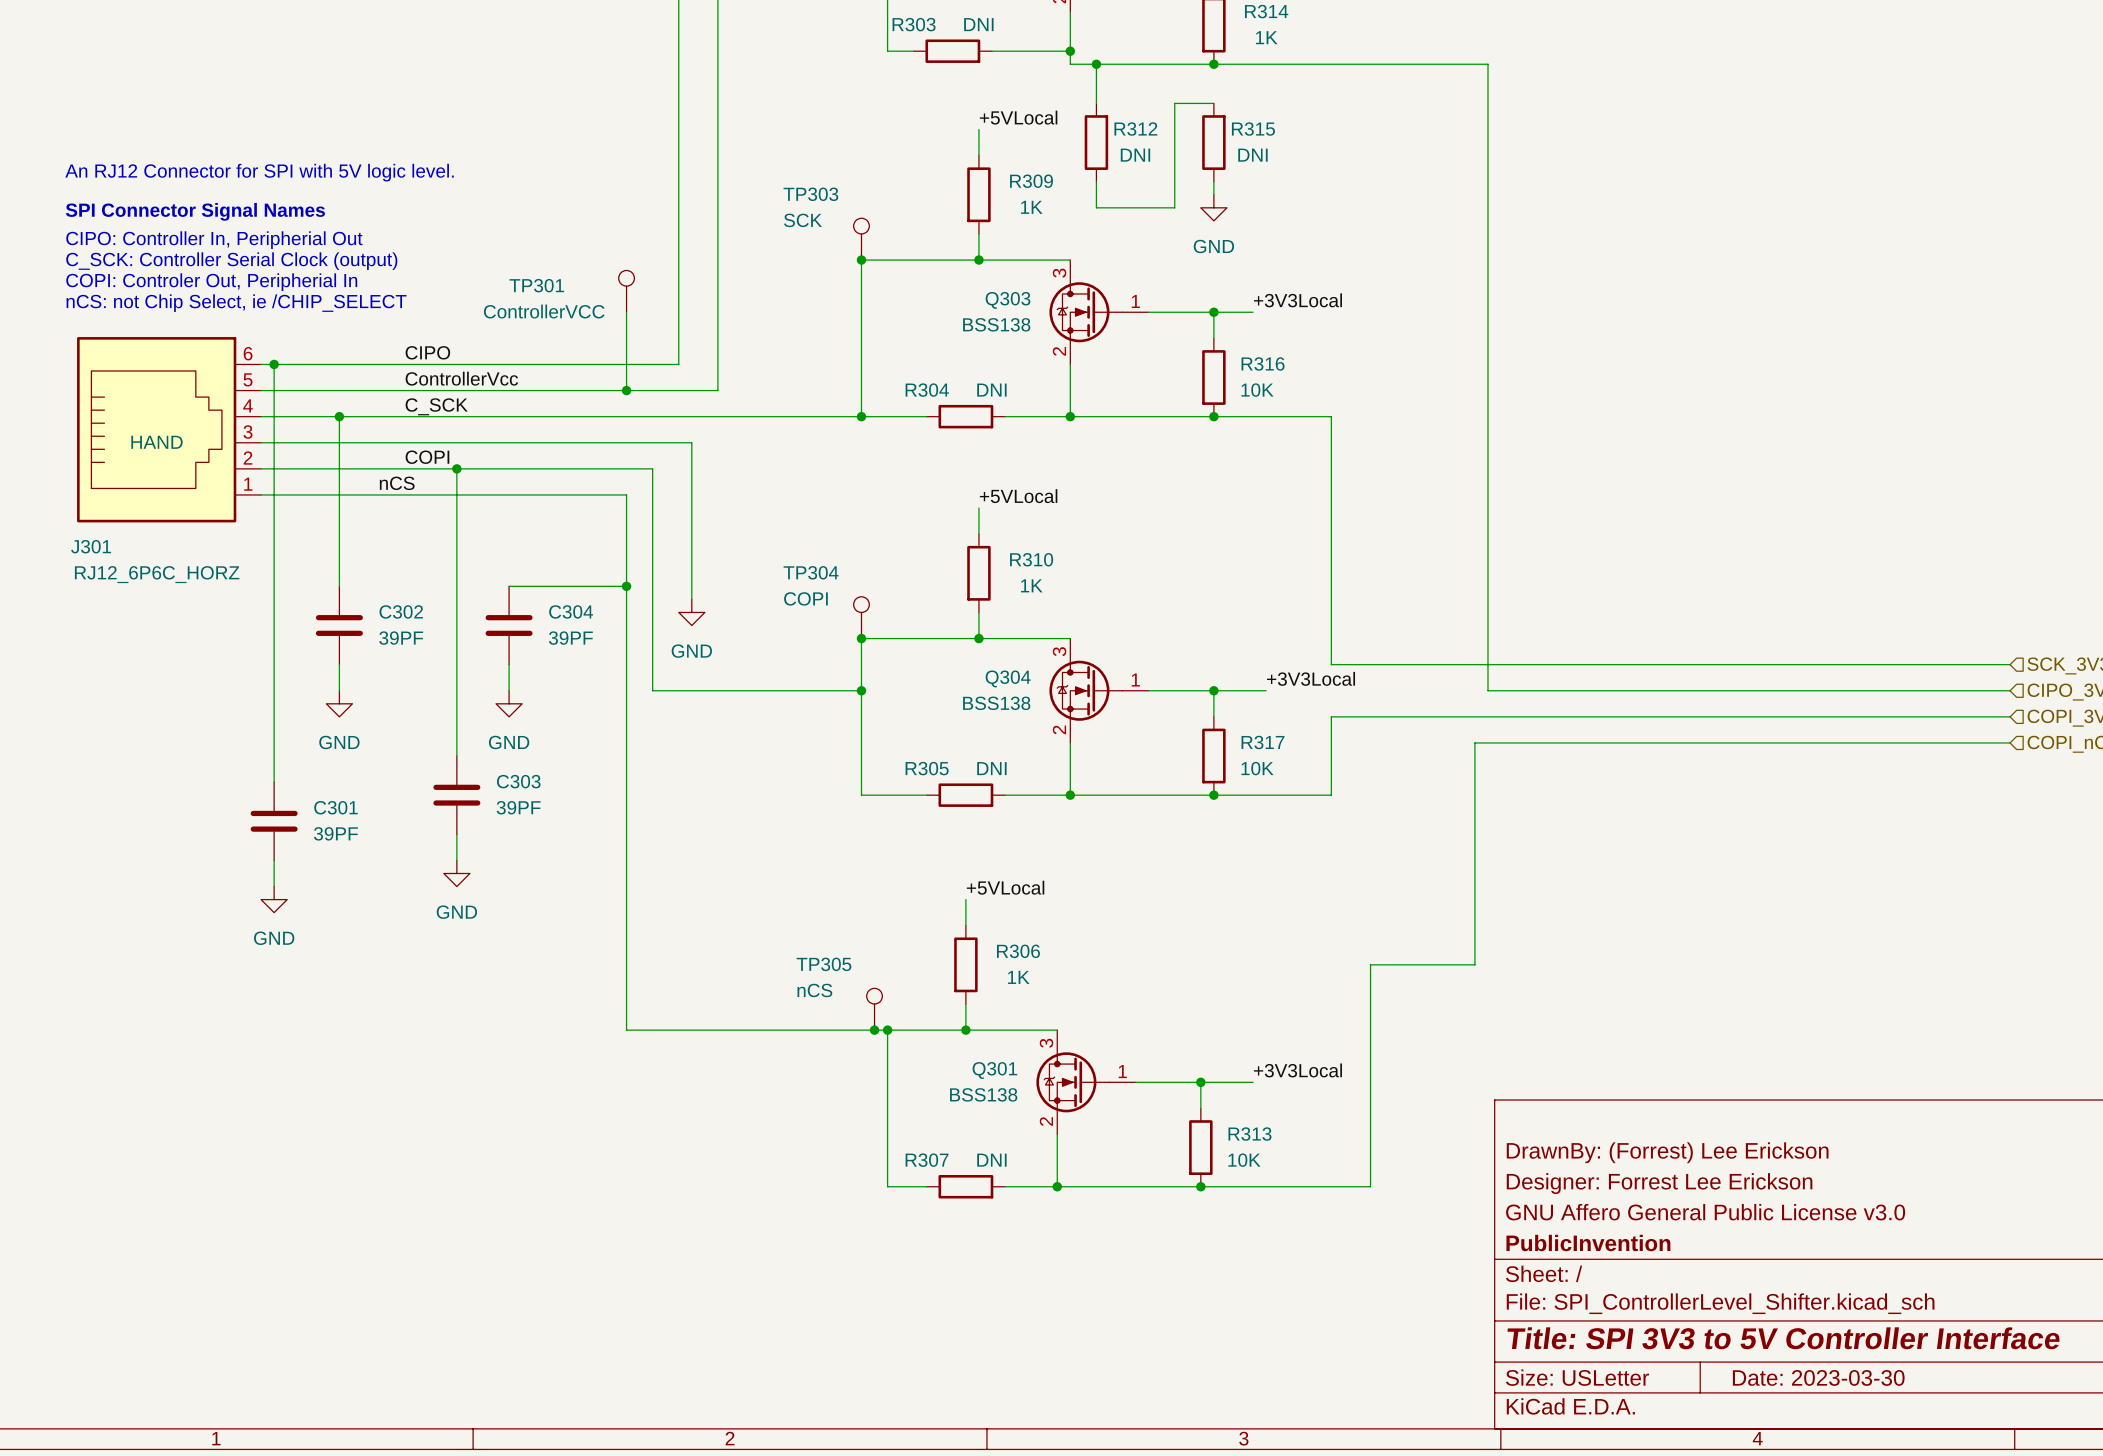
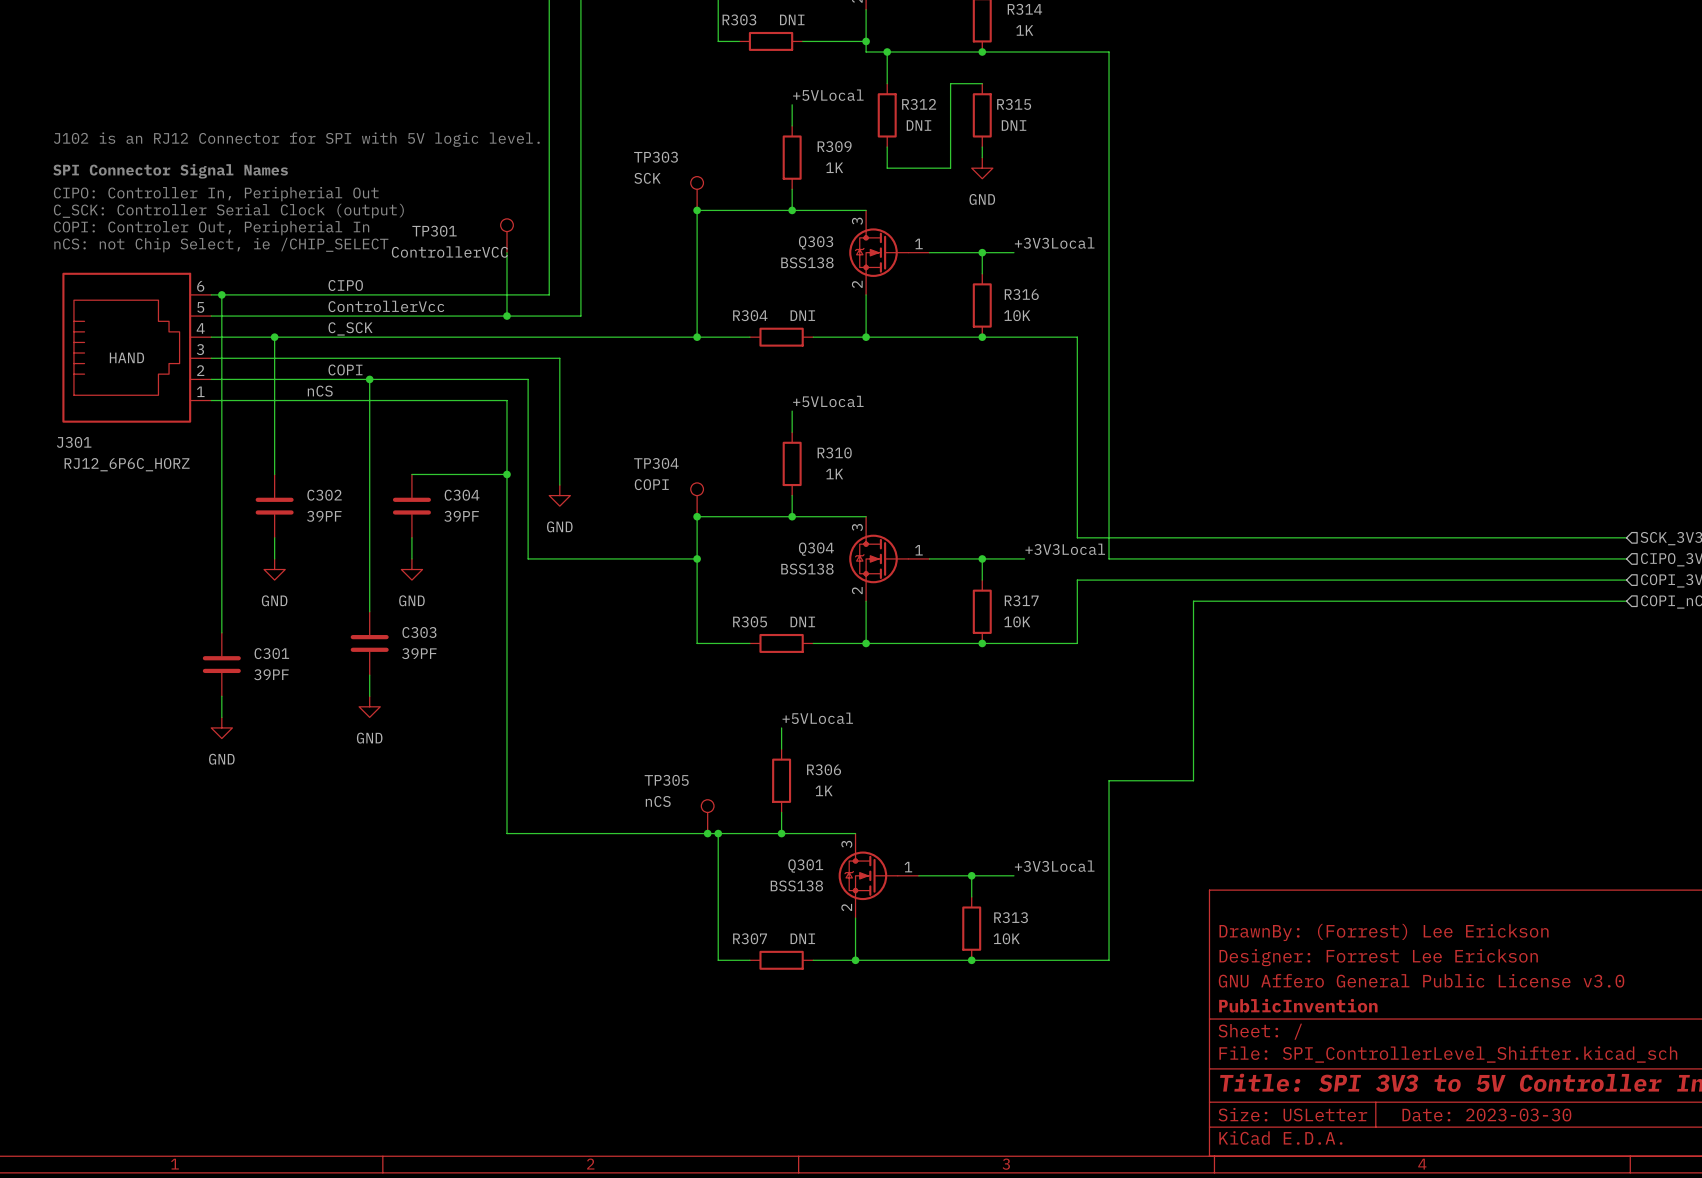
wire: (1370, 64) (1487, 64) (1487, 690) -> (1109, 52) (1109, 558) (1204, 558)
text: An RJ12 Connector for SPI with 5V logic level. (259, 172) -> J102 is an RJ12 Connector for SPI with 5V logic level. (296, 139)

